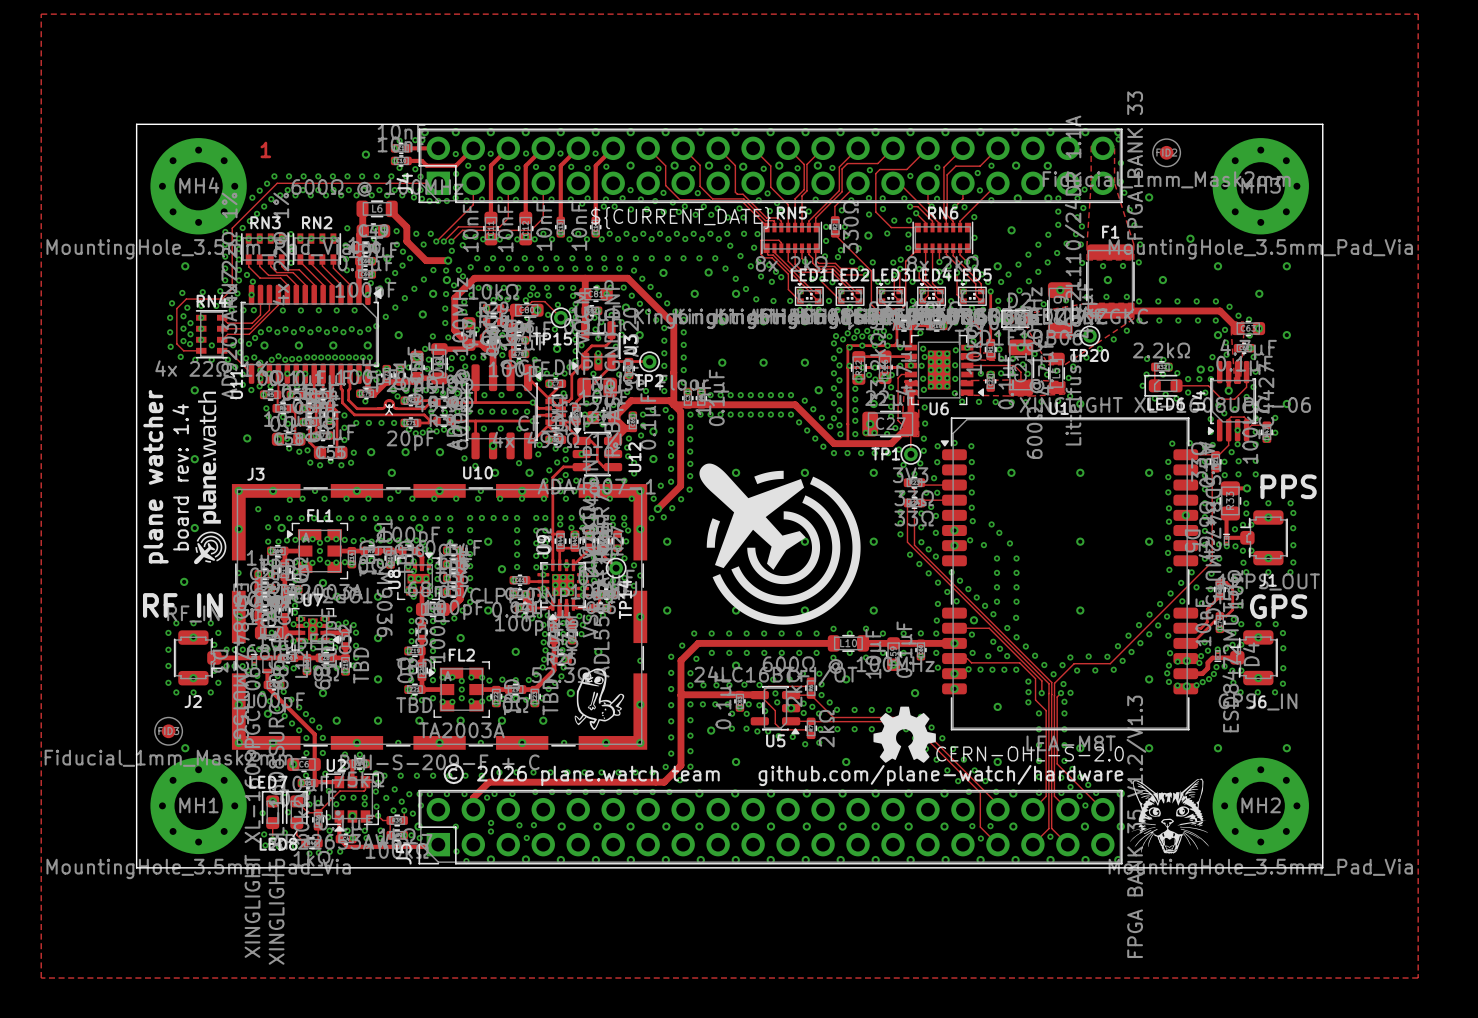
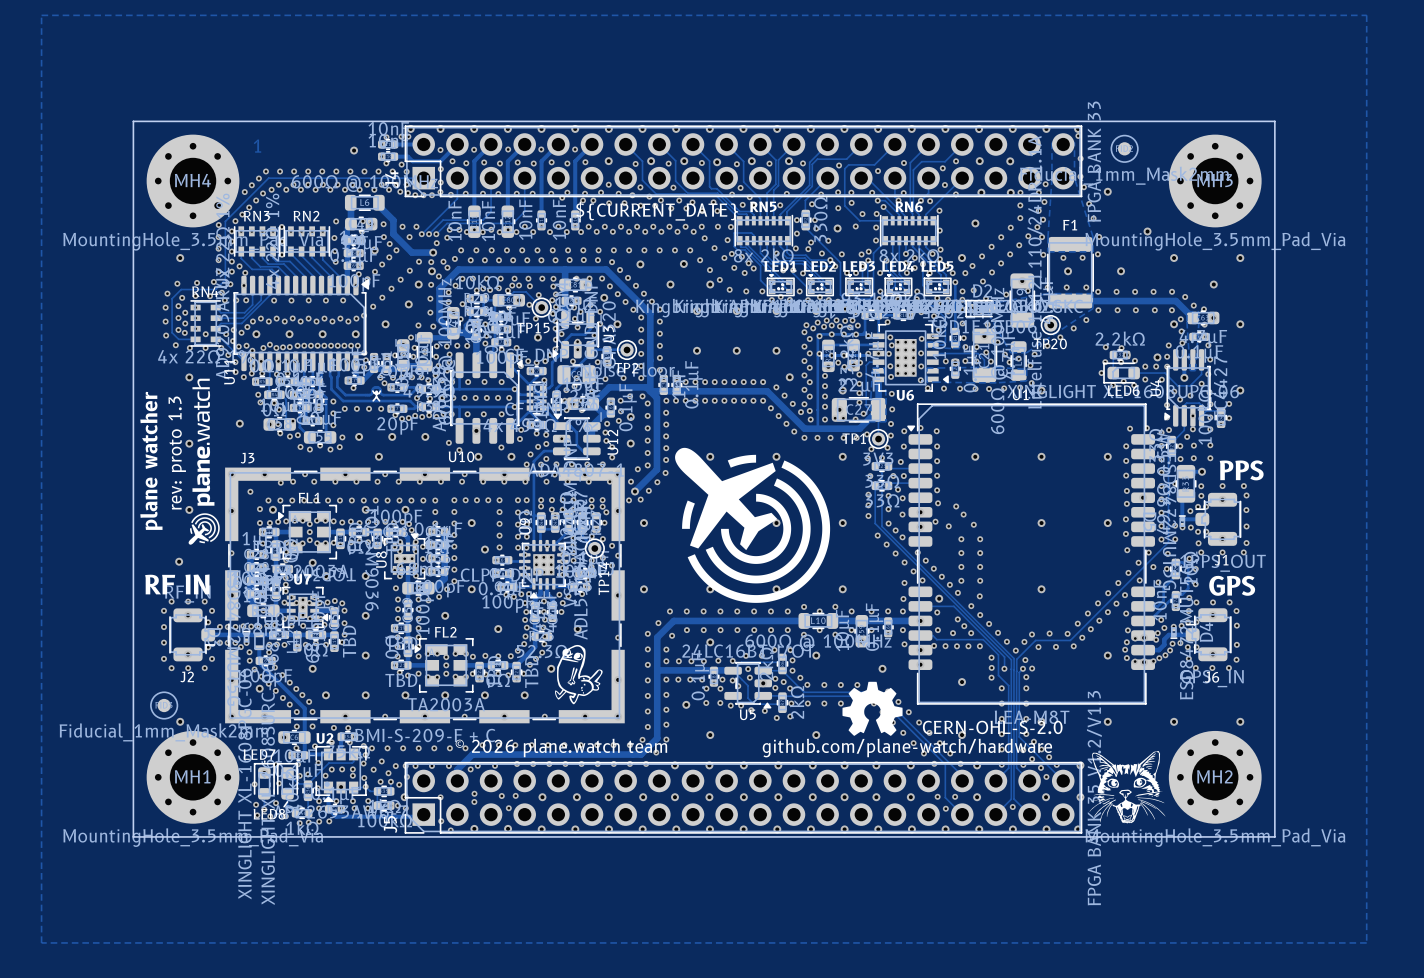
text: board rev: 1.4 (180, 477) -> rev: proto 1.3 (177, 452)
part footprint: [347, 546, 357, 569] -> [334, 528, 347, 550]

